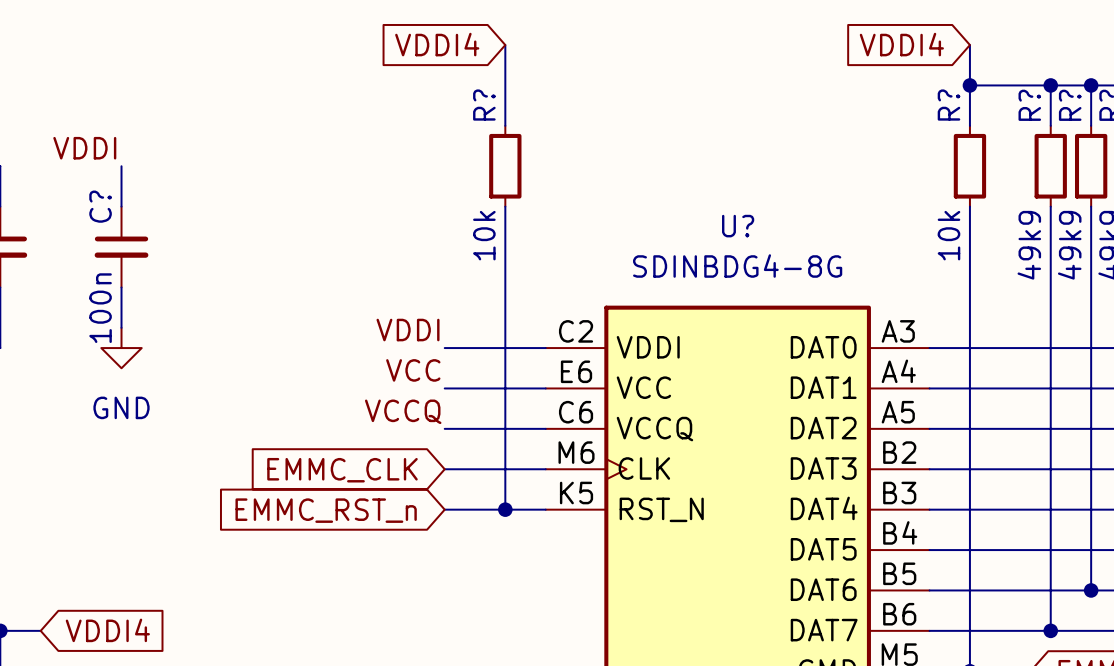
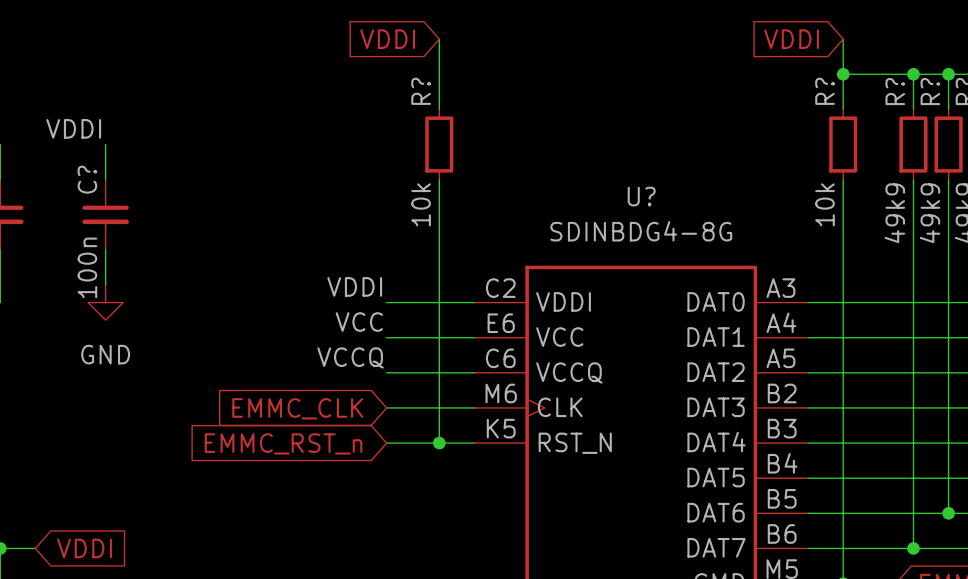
global label: VDDI4 (437, 44) -> VDDI (387, 39)
global label: VDDI4 (901, 44) -> VDDI (791, 39)
global label: VDDI4 (107, 630) -> VDDI (84, 548)

